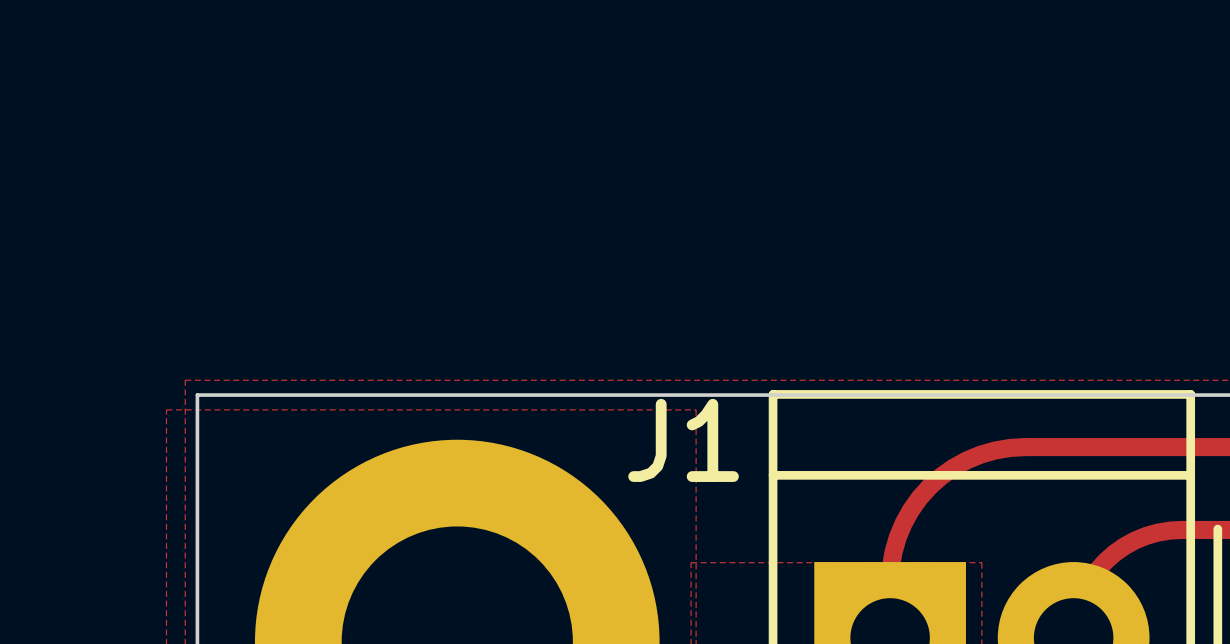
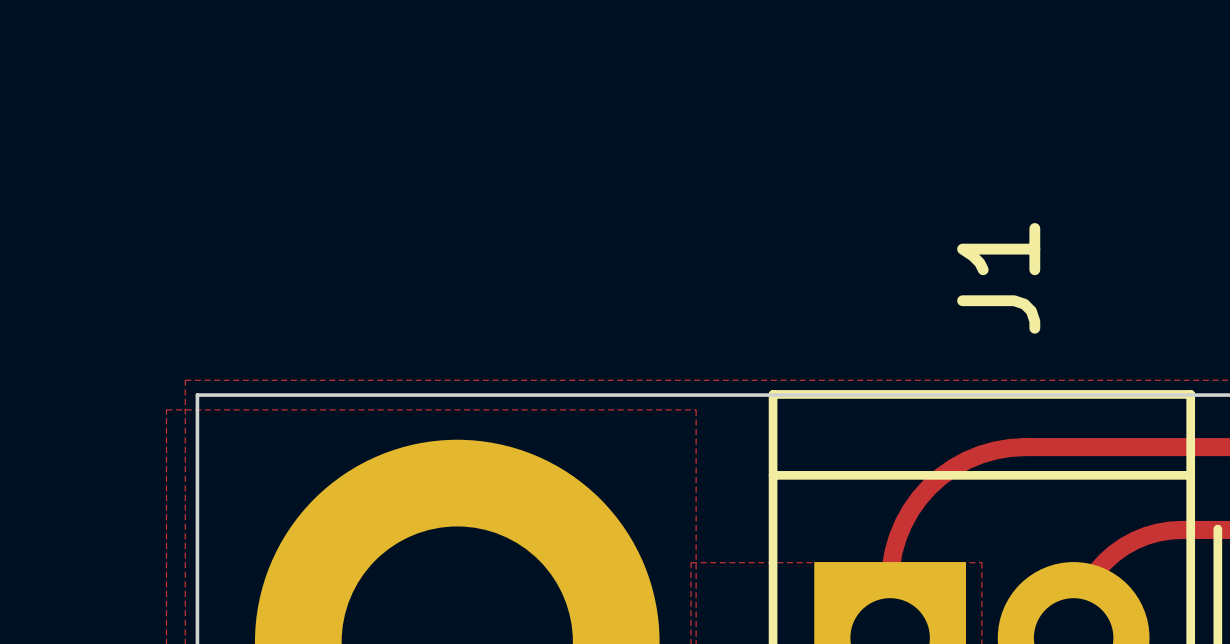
J1 name rotation: 0° (683, 440) -> 90° counterclockwise (998, 278)
J1 name position: J1 (683, 440) -> J1 (998, 278)

